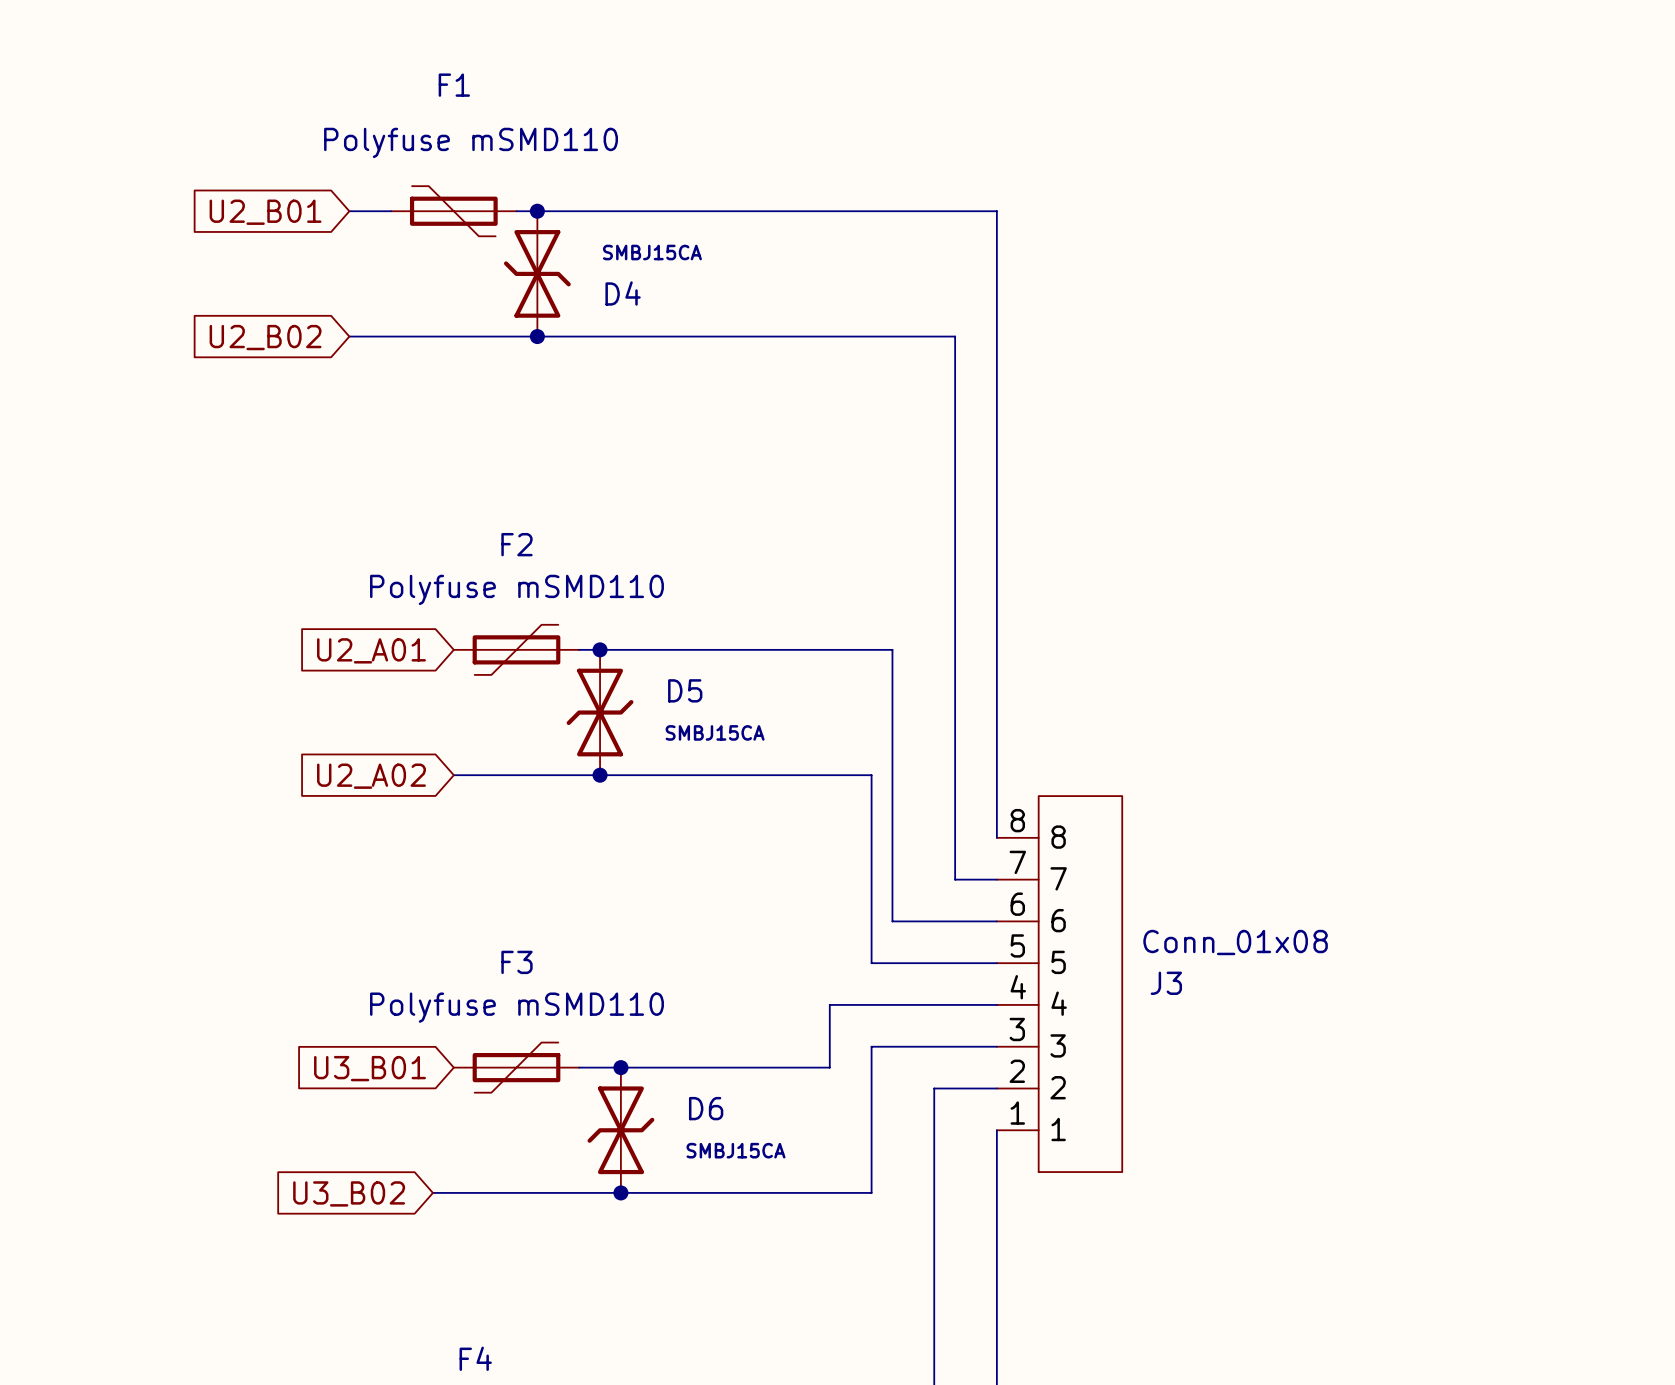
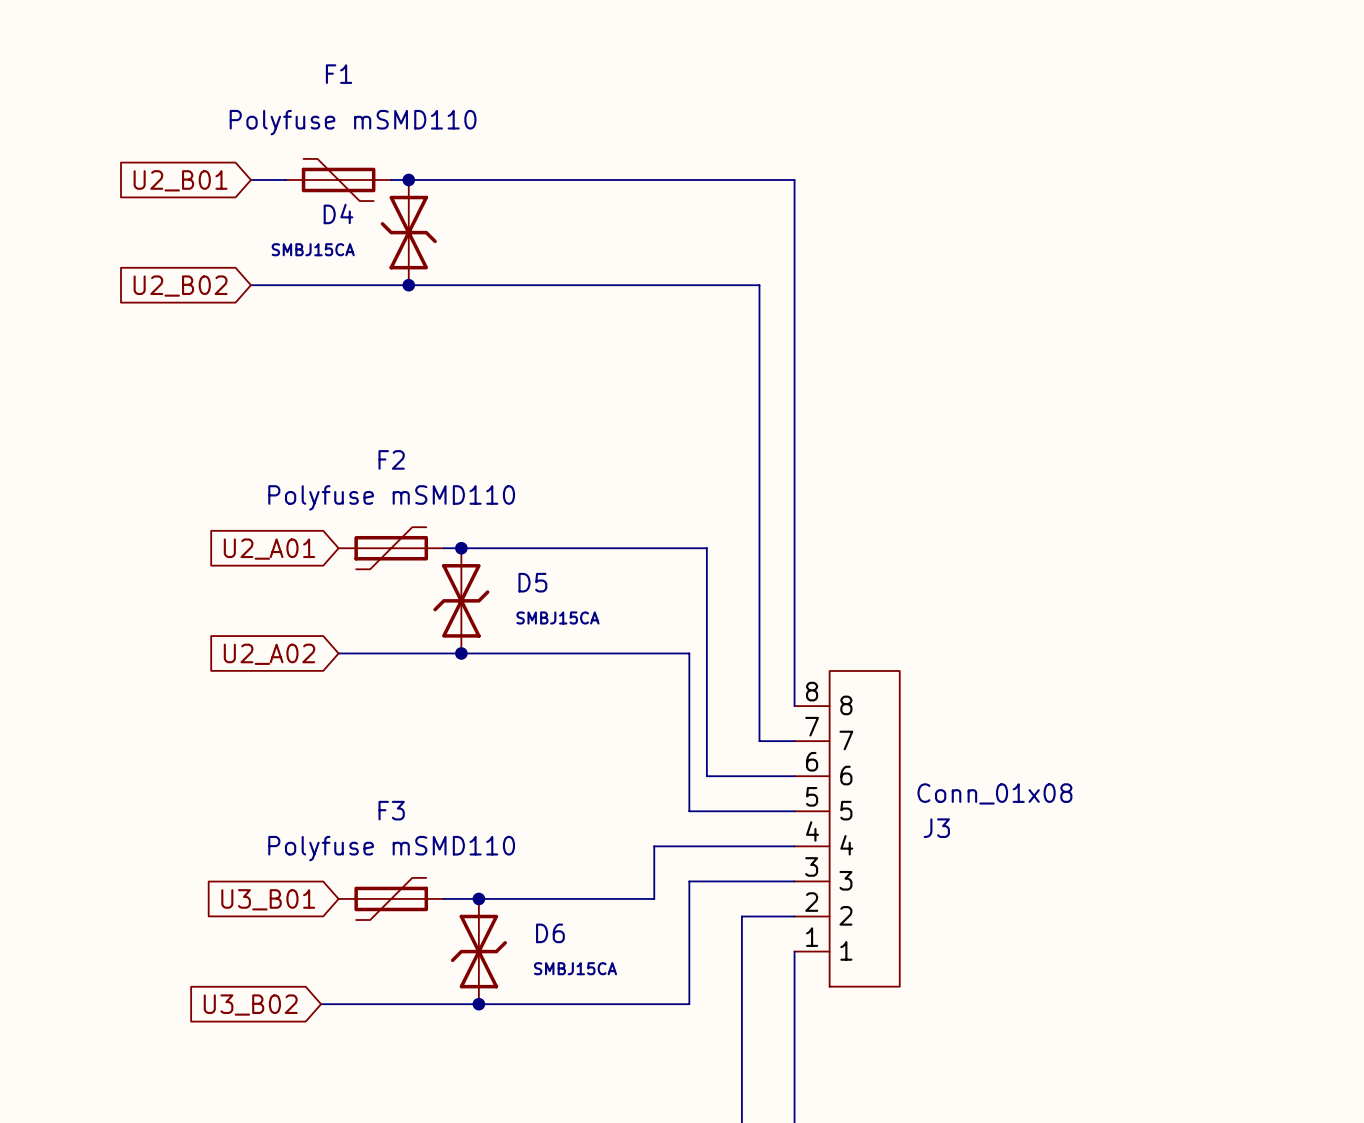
D4 value position: SMBJ15CA (652, 252) -> SMBJ15CA (313, 249)
D4 name position: D4 (623, 293) -> D4 (338, 213)

